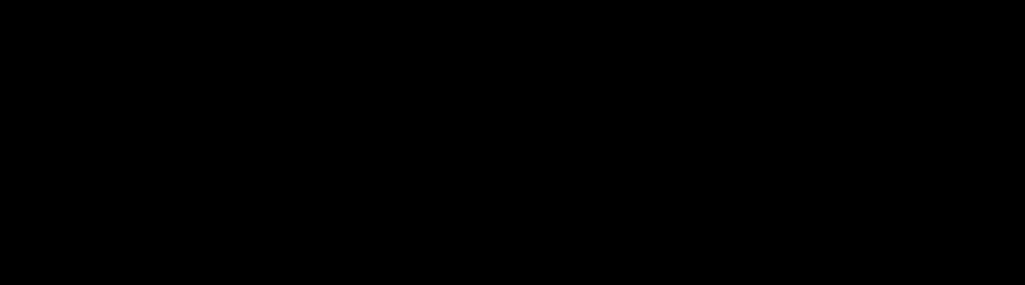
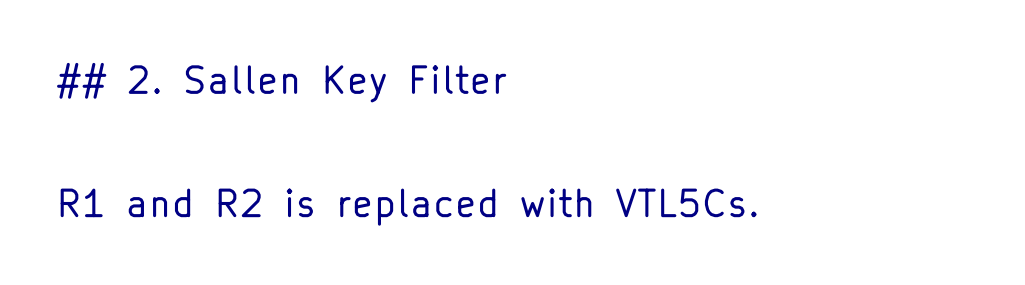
text: none -> ## 2. Sallen Key Filter (281, 82)
text: none -> R1 and R2 is replaced with VTL5Cs. (408, 207)

